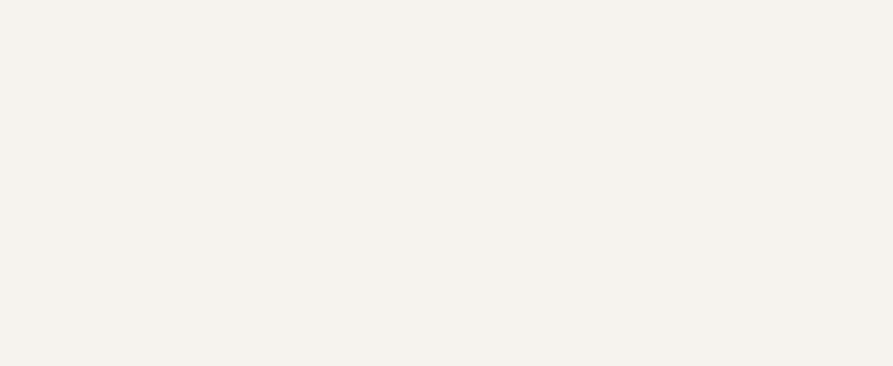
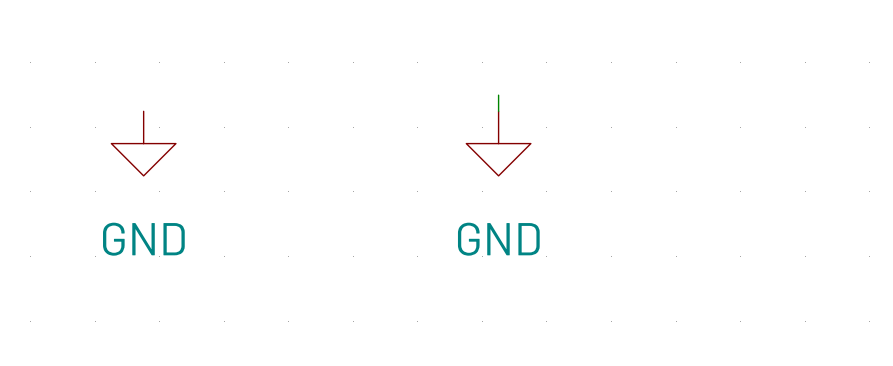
wire: none -> (498, 95) (498, 111)
power symbol: none -> GND (143, 143)
power symbol: none -> GND (498, 143)

